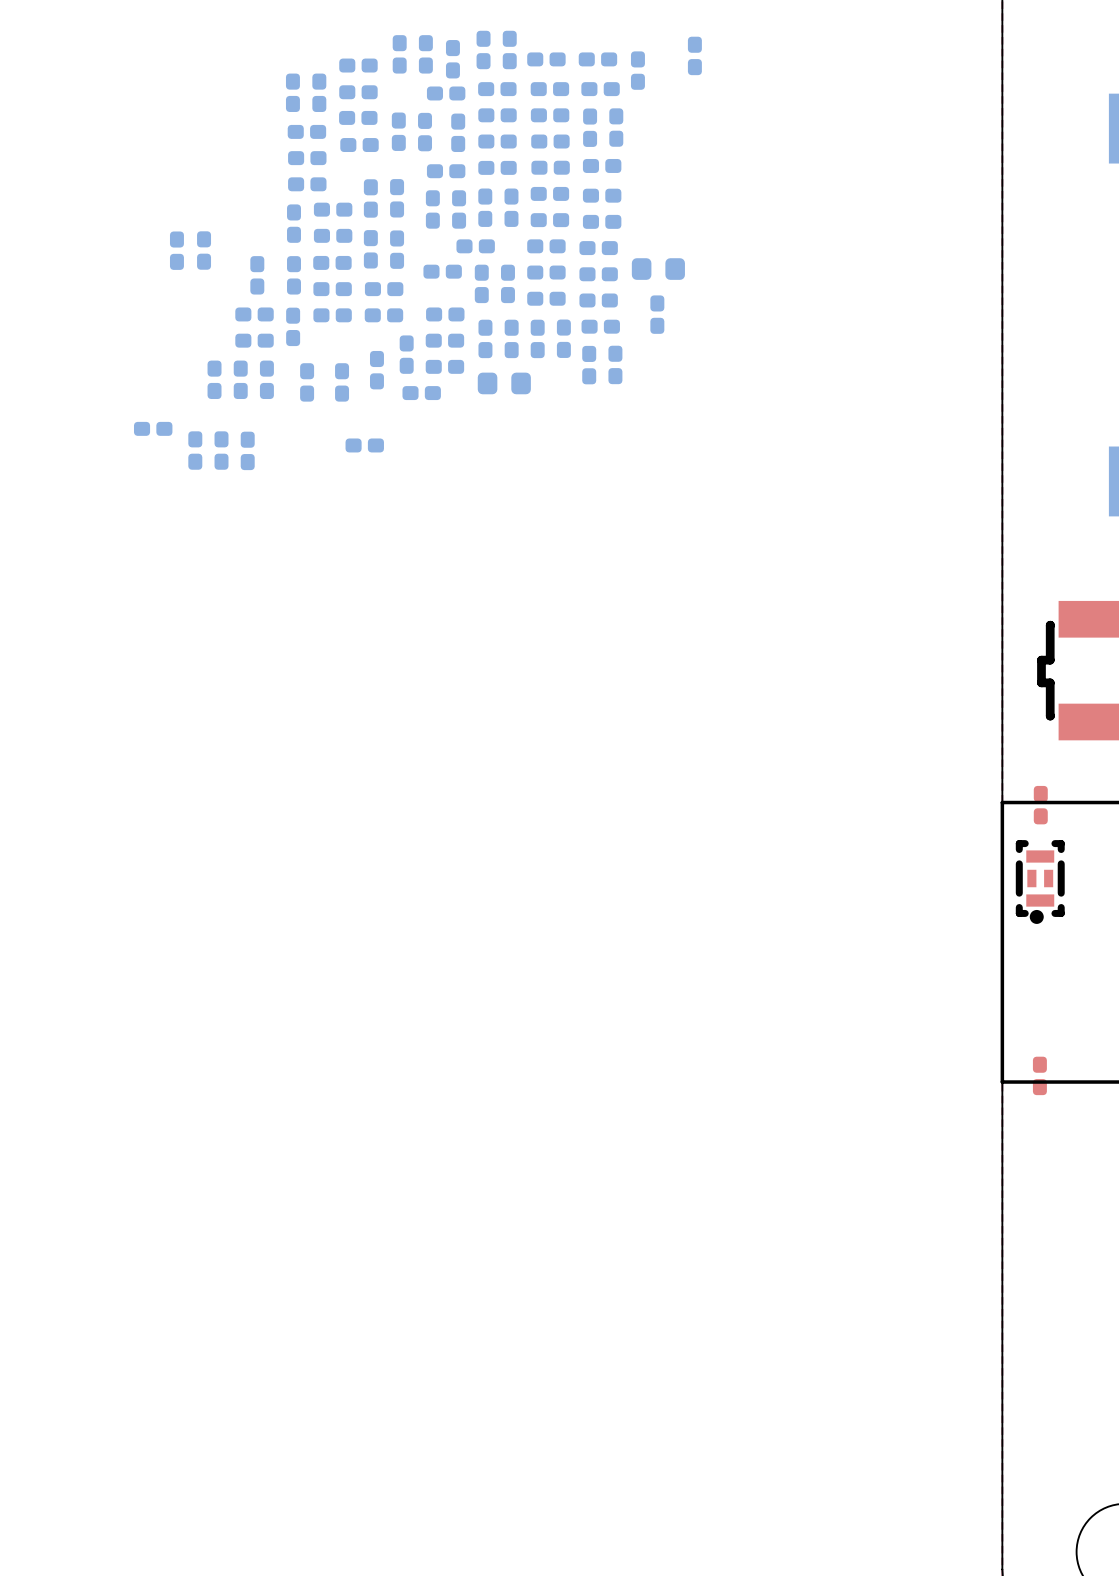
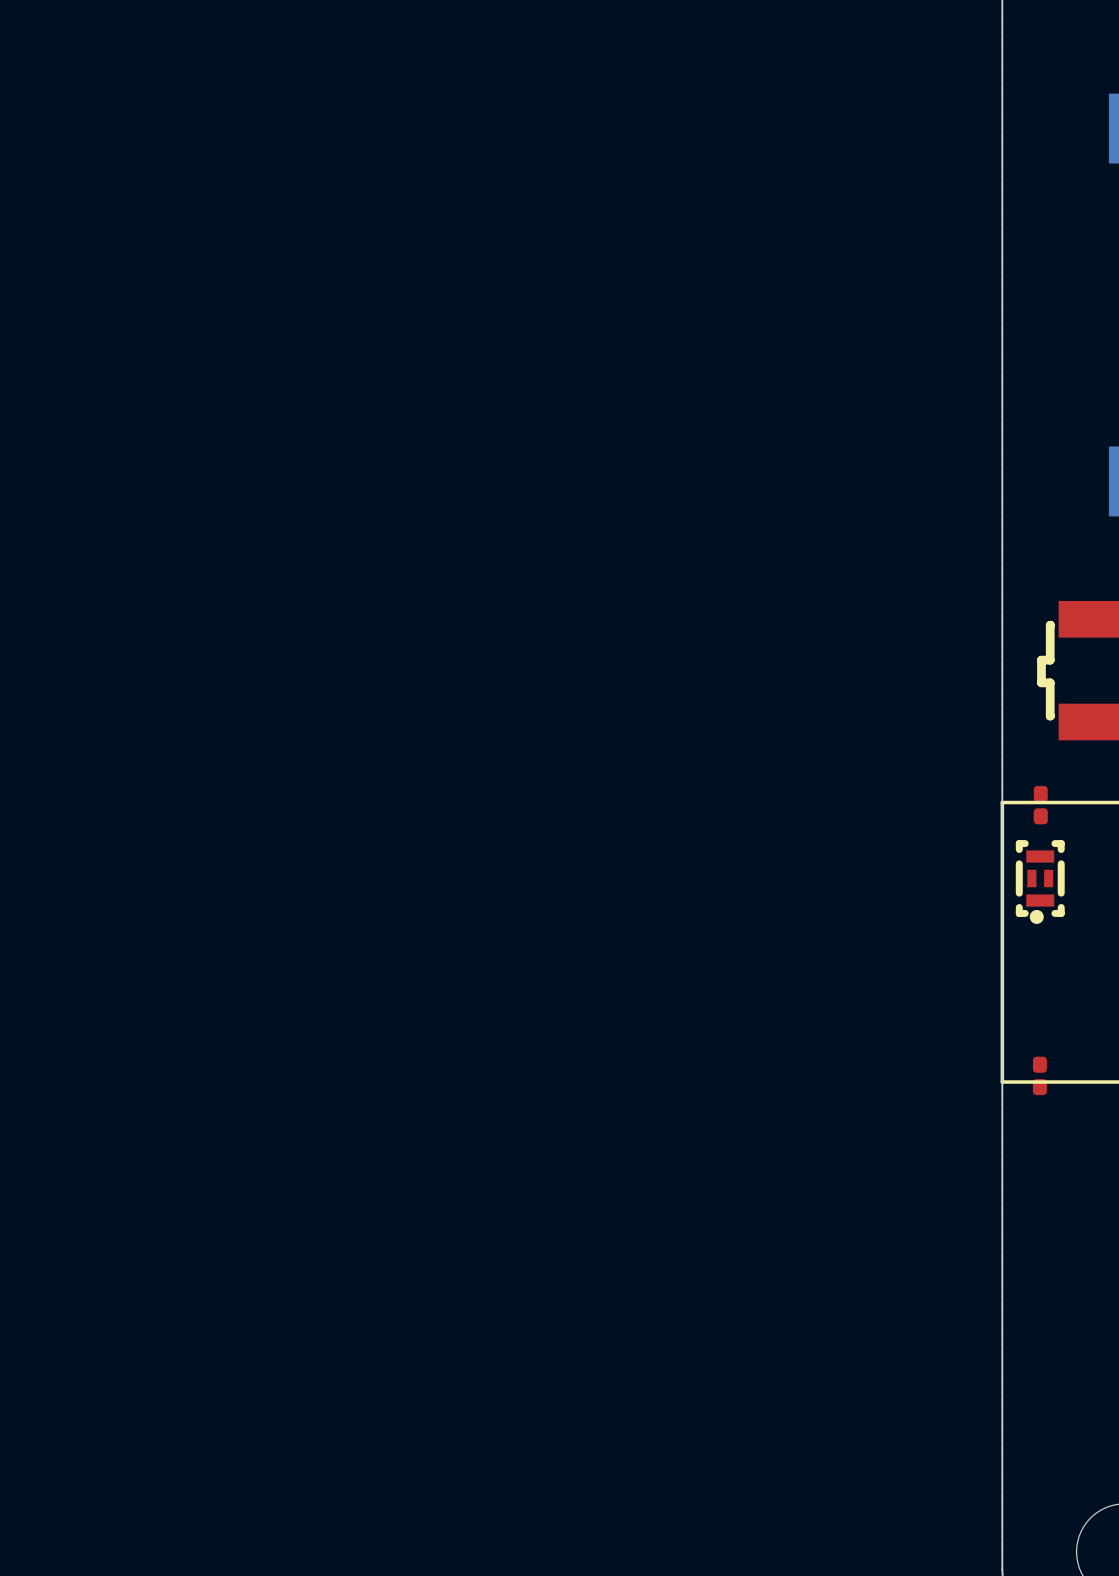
part: (483, 49) -> none
part: (509, 49) -> none
part: (399, 54) -> none
part: (425, 54) -> none
part: (694, 55) -> none
part: (452, 59) -> none
part: (546, 59) -> none
part: (597, 59) -> none
part: (358, 65) -> none
part: (637, 70) -> none
part: (497, 89) -> none
part: (549, 89) -> none
part: (600, 89) -> none
part: (292, 92) -> none
part: (319, 92) -> none
part: (358, 92) -> none
part: (446, 93) -> none
part: (497, 115) -> none
part: (550, 115) -> none
part: (358, 117) -> none
part: (590, 127) -> none
part: (616, 127) -> none
part: (306, 131) -> none
part: (398, 131) -> none
part: (425, 132) -> none
part: (458, 132) -> none
part: (497, 141) -> none
part: (550, 141) -> none
part: (359, 145) -> none
part: (307, 158) -> none
part: (602, 165) -> none
part: (497, 167) -> none
part: (550, 167) -> none
part: (446, 171) -> none
part: (307, 184) -> none
part: (549, 193) -> none
part: (602, 195) -> none
part: (370, 198) -> none
part: (397, 198) -> none
part: (485, 207) -> none
part: (511, 207) -> none
part: (333, 209) -> none
part: (432, 209) -> none
part: (459, 209) -> none
part: (549, 220) -> none
part: (602, 221) -> none
part: (294, 223) -> none
part: (333, 235) -> none
part: (475, 246) -> none
part: (546, 246) -> none
part: (598, 248) -> none
part: (370, 249) -> none
part: (397, 249) -> none
part: (176, 250) -> none
part: (204, 250) -> none
part: (332, 262) -> none
part: (658, 269) -> none
part: (442, 271) -> none
part: (546, 272) -> none
part: (598, 274) -> none
part: (257, 275) -> none
part: (294, 275) -> none
part: (481, 283) -> none
part: (507, 283) -> none
part: (332, 289) -> none
part: (384, 289) -> none
part: (546, 298) -> none
part: (598, 300) -> none
part: (254, 314) -> none
part: (445, 314) -> none
part: (657, 314) -> none
part: (332, 315) -> none
part: (383, 315) -> none
part: (293, 326) -> none
part: (600, 326) -> none
part: (485, 338) -> none
part: (511, 338) -> none
part: (537, 338) -> none
part: (563, 338) -> none
part: (254, 340) -> none
part: (444, 340) -> none
part: (406, 354) -> none
part: (615, 364) -> none
part: (589, 365) -> none
part: (444, 366) -> none
part: (376, 370) -> none
part: (214, 379) -> none
part: (240, 379) -> none
part: (266, 379) -> none
part: (307, 382) -> none
part: (342, 382) -> none
part: (504, 383) -> none
part: (421, 393) -> none
part: (153, 428) -> none
part: (364, 445) -> none
part: (195, 450) -> none
part: (221, 450) -> none
part: (247, 450) -> none

